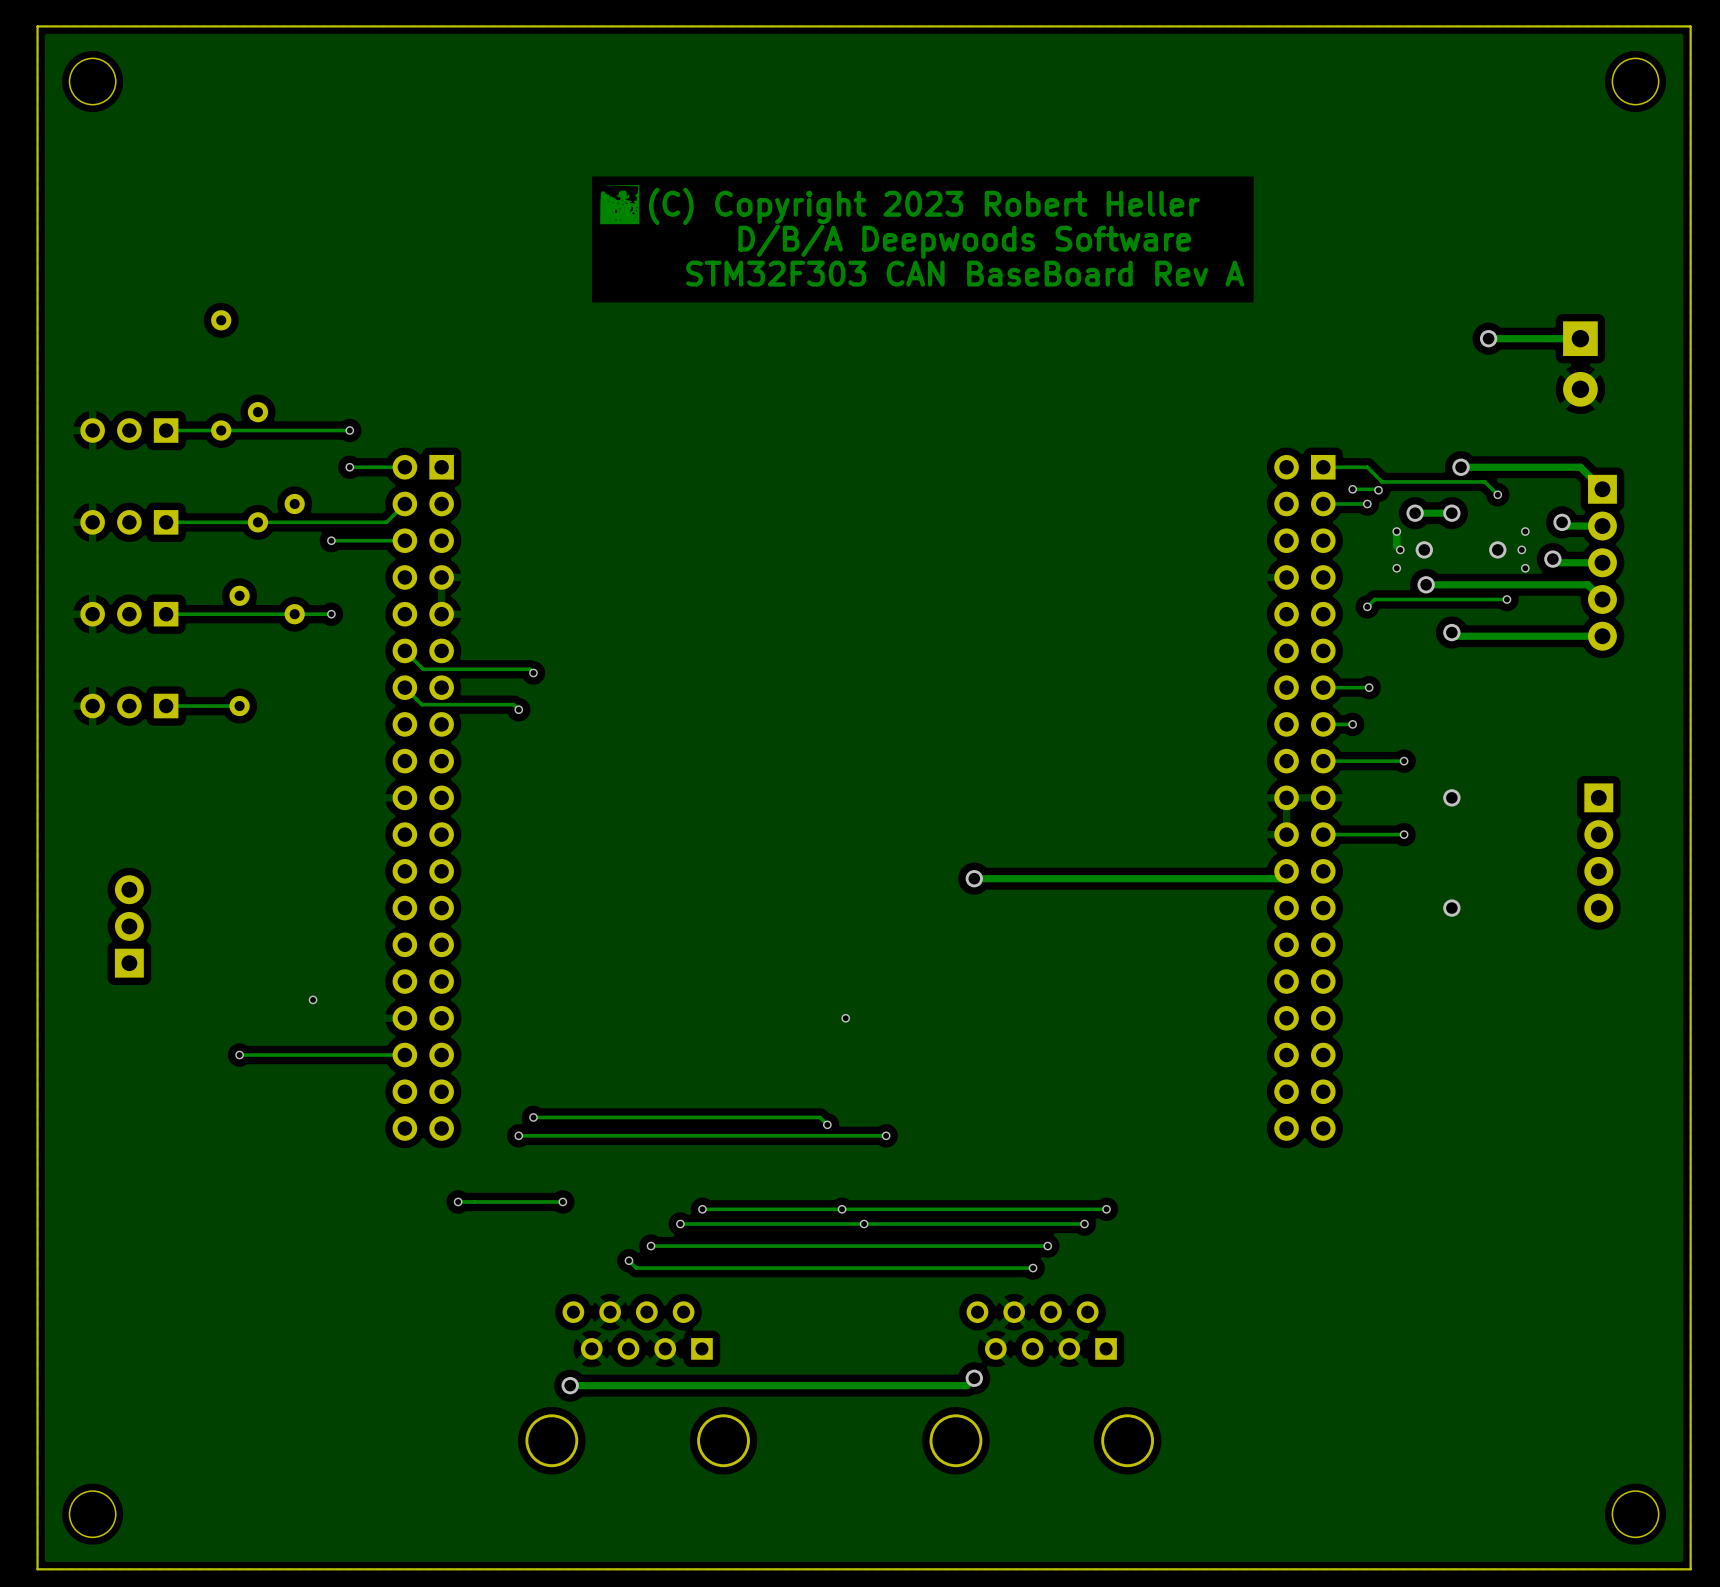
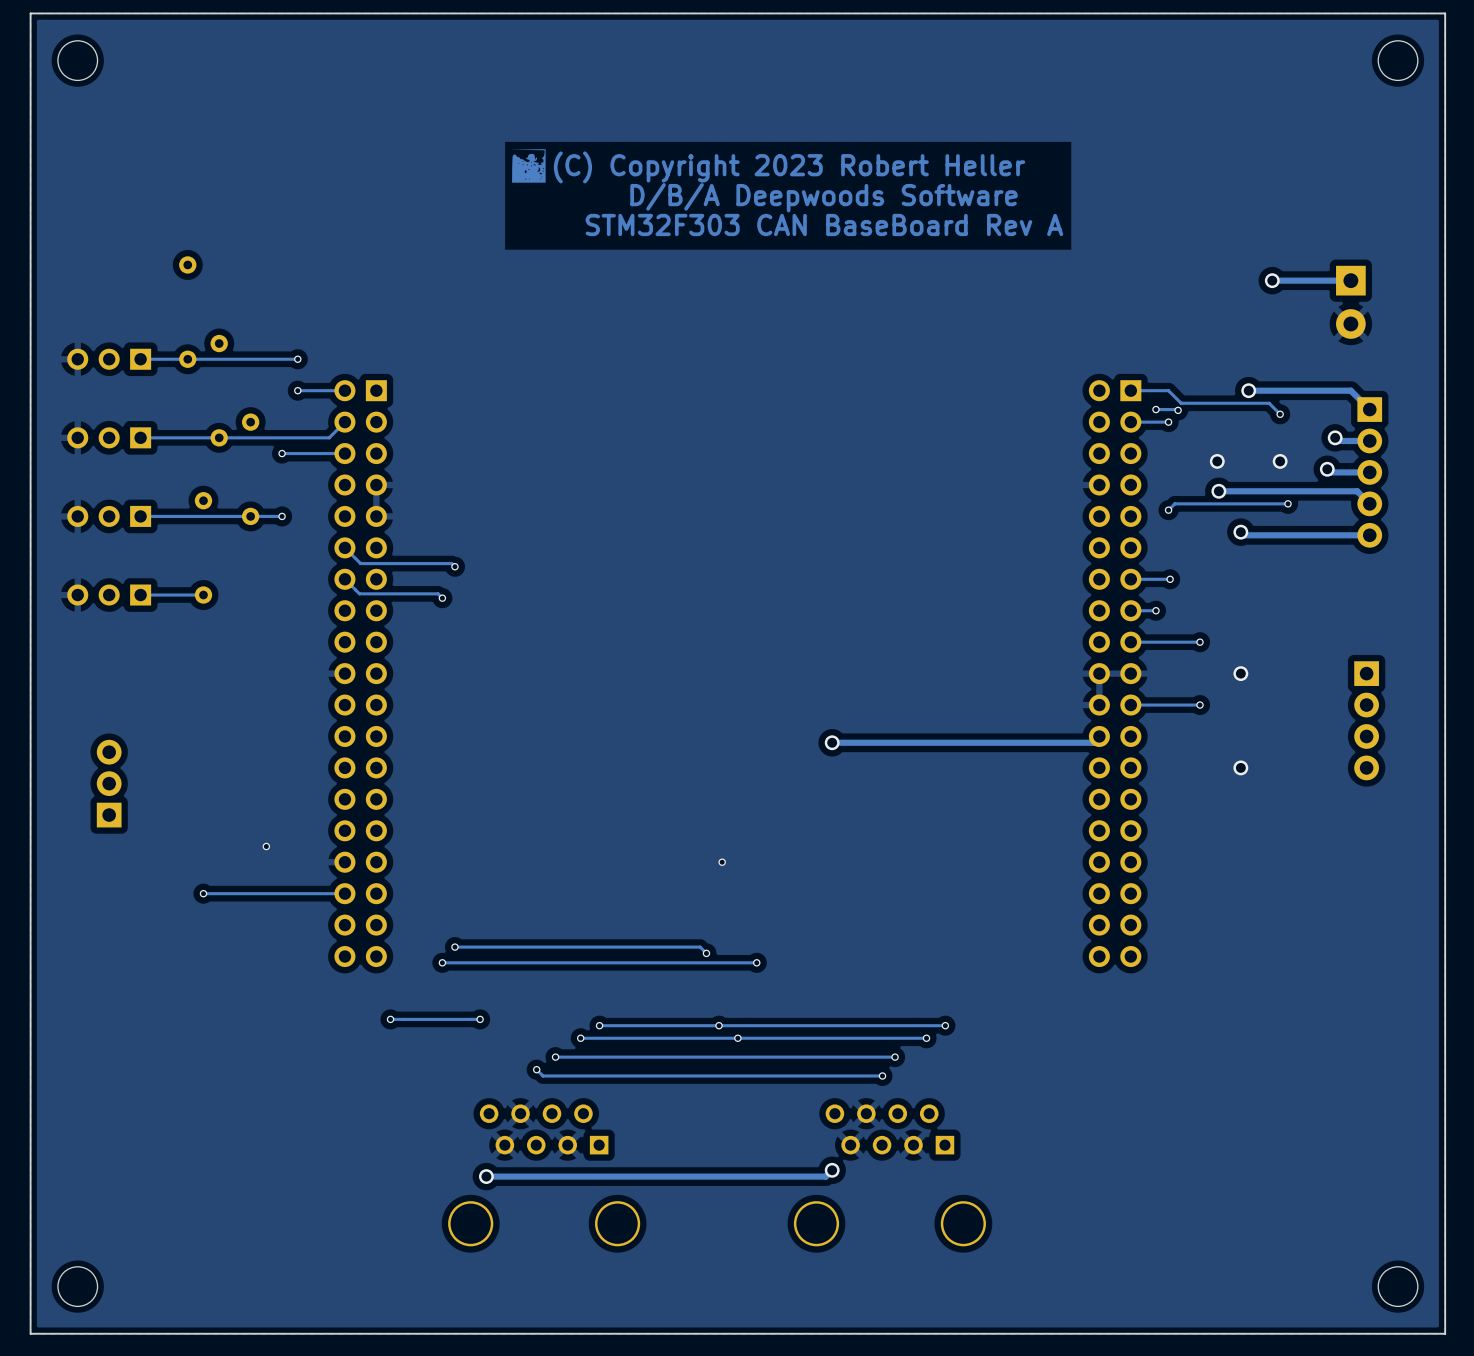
via: (1415, 513) -> none
track: (1451, 513) (1415, 513) -> none
via: (1451, 513) -> none
track: (1396, 531) (1396, 546) (1400, 549) -> none
via: (1396, 531) -> none
via: (1525, 531) -> none
via: (1400, 549) -> none
via: (1521, 549) -> none
via: (1396, 568) -> none
via: (1525, 568) -> none

